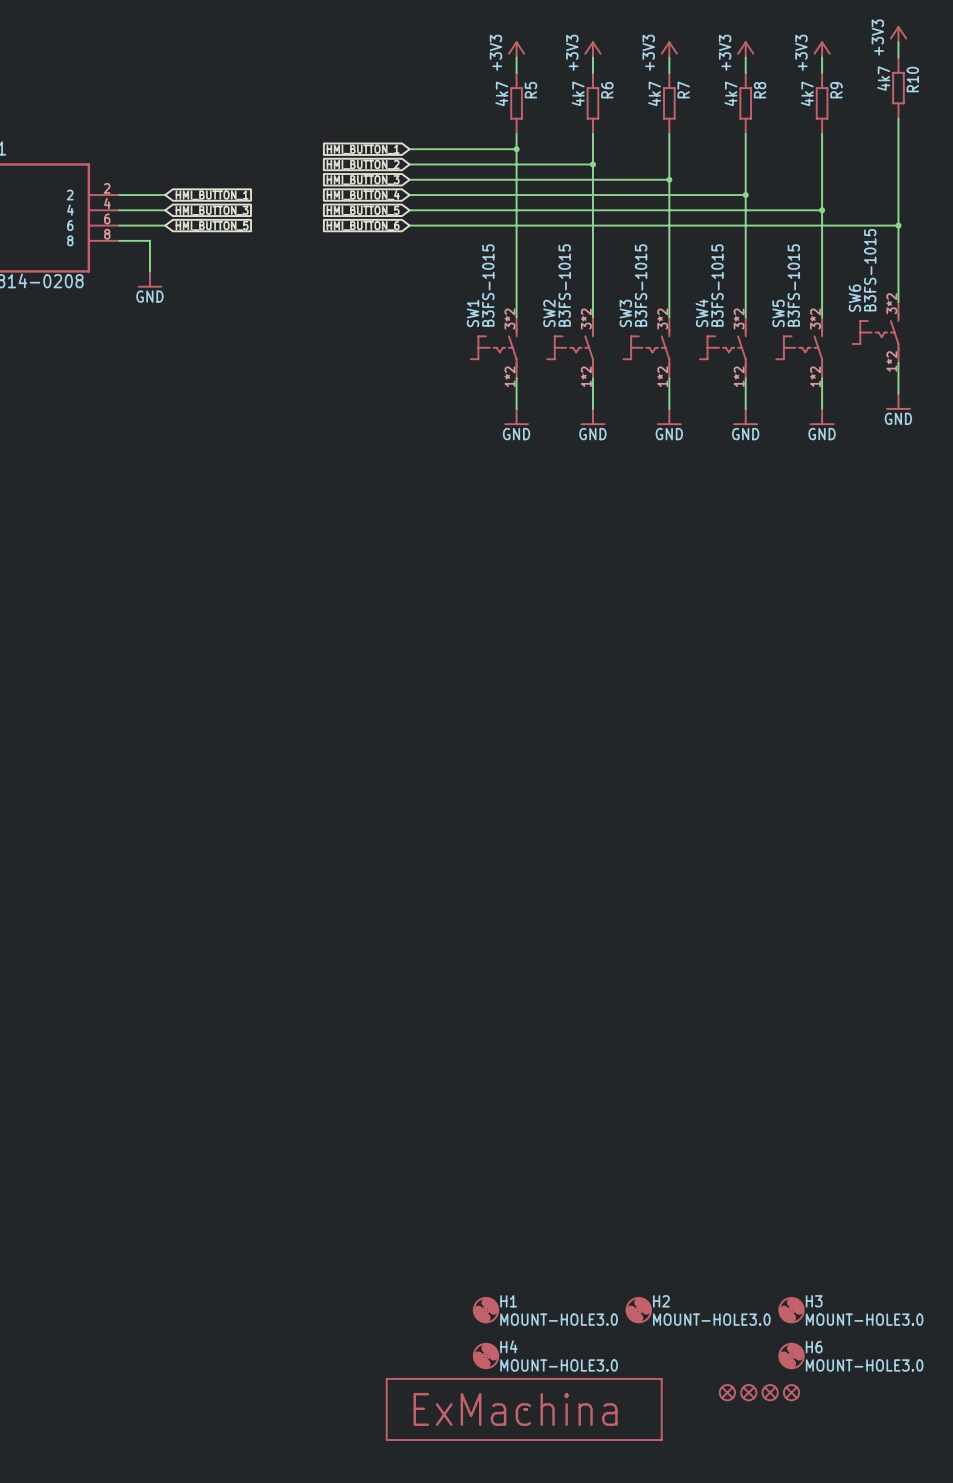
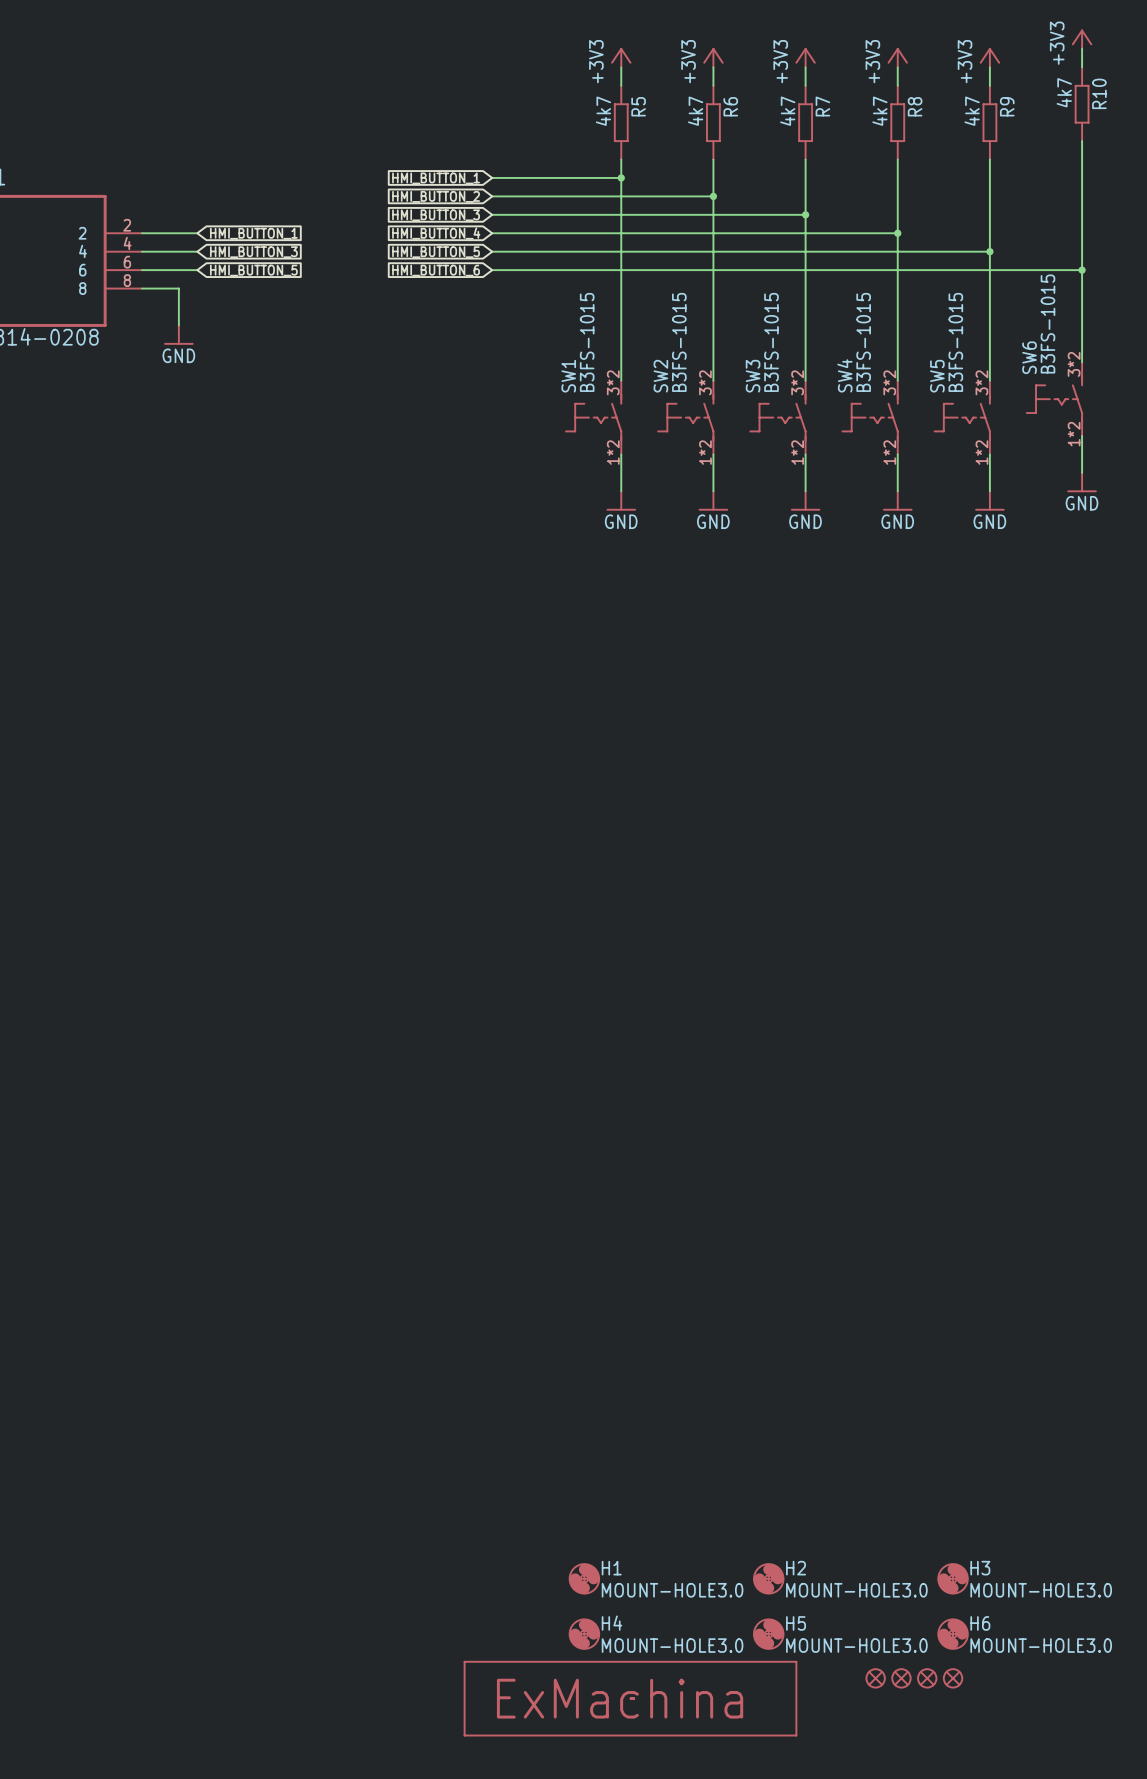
H5: none -> MOUNT-HOLE3.0 (768, 1634)

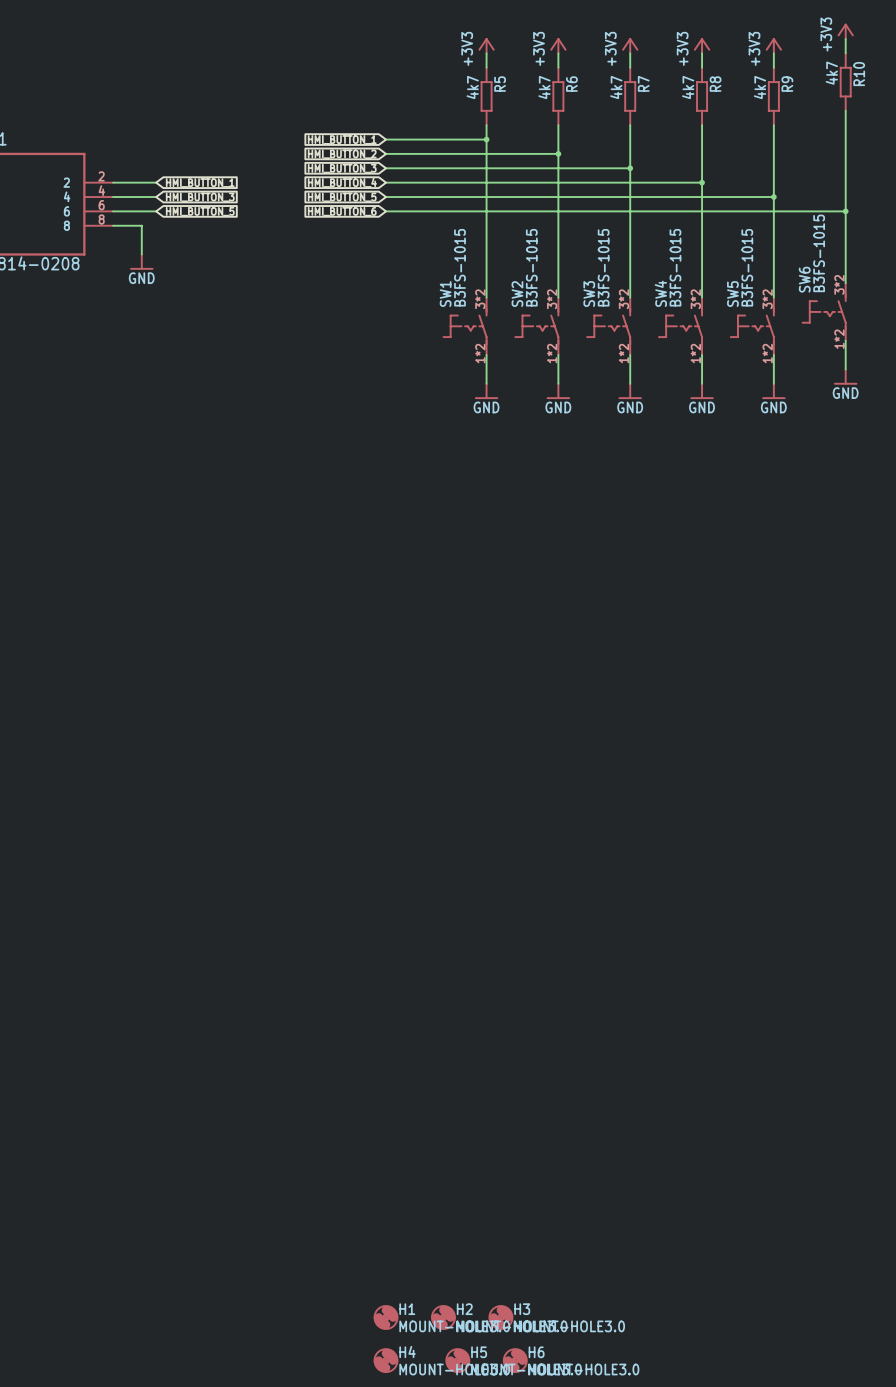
H1 position: (584, 1578) -> (386, 1317)
H2 position: (768, 1578) -> (443, 1317)
H3 position: (953, 1578) -> (500, 1317)
H4 position: (584, 1634) -> (386, 1360)
H5 position: (768, 1634) -> (457, 1360)
H6 position: (953, 1634) -> (515, 1360)
part: (875, 1678) -> none
part: (901, 1678) -> none
part: (927, 1678) -> none
part: (953, 1678) -> none
part: (630, 1698) -> none

